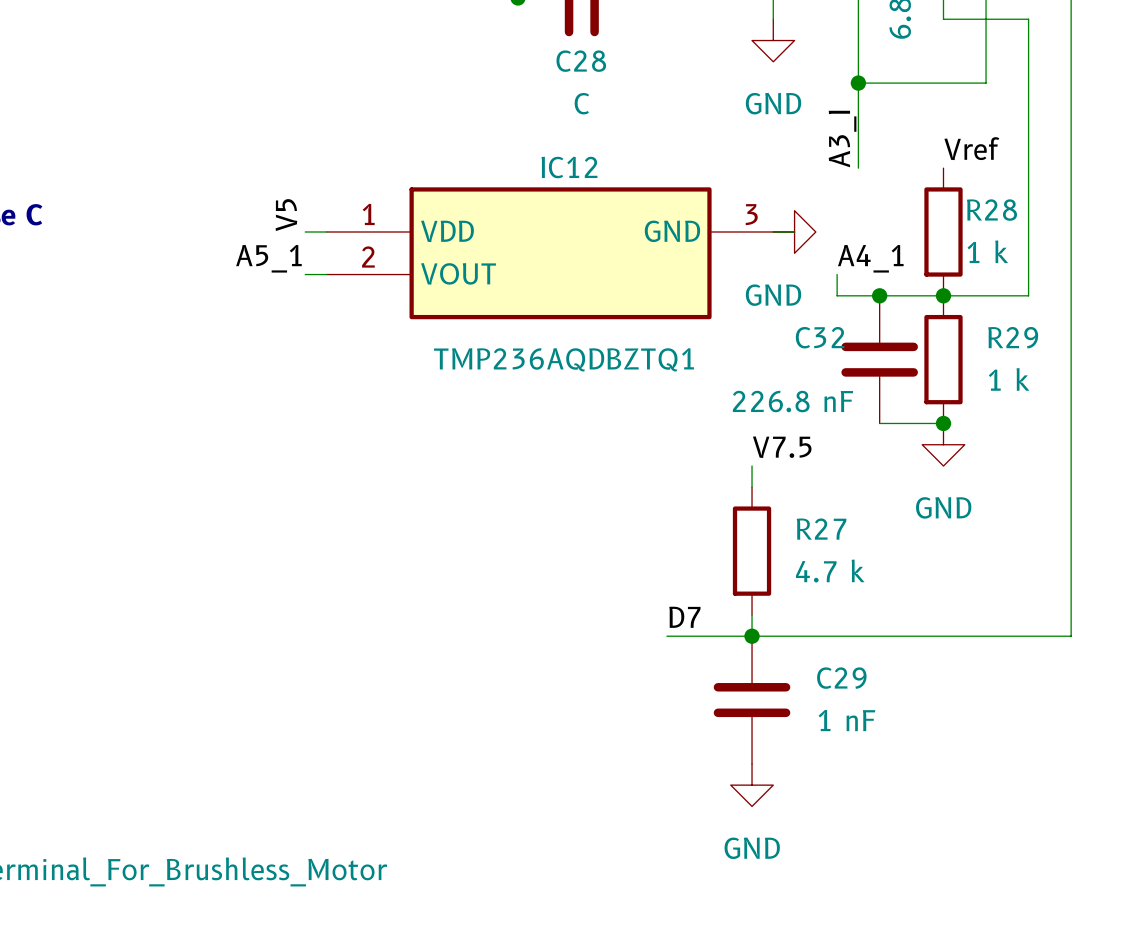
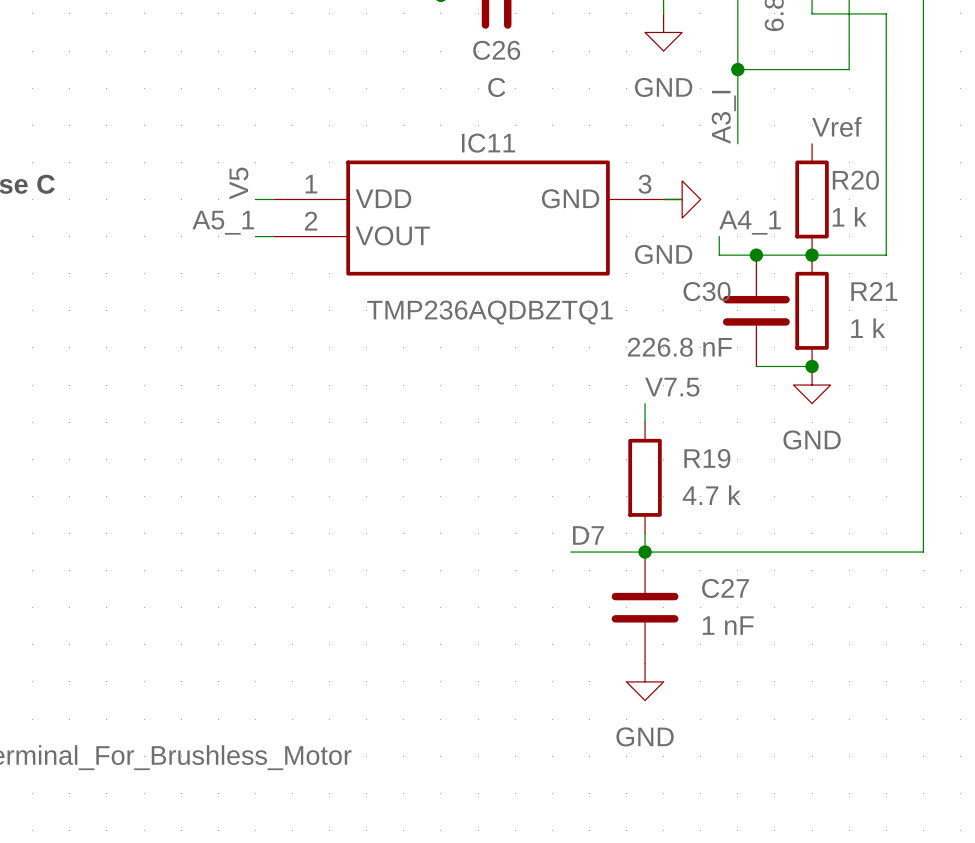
C28 name: C28 (581, 61) -> C26 (496, 50)
IC12 name: IC12 (569, 167) -> IC11 (488, 143)
R28 name: R28 (991, 210) -> R20 (855, 180)
C32 name: C32 (820, 337) -> C30 (707, 291)
R29 name: R29 (1013, 337) -> R21 (874, 291)
R27 name: R27 (821, 529) -> R19 (707, 458)
C29 name: C29 (841, 678) -> C27 (725, 588)

